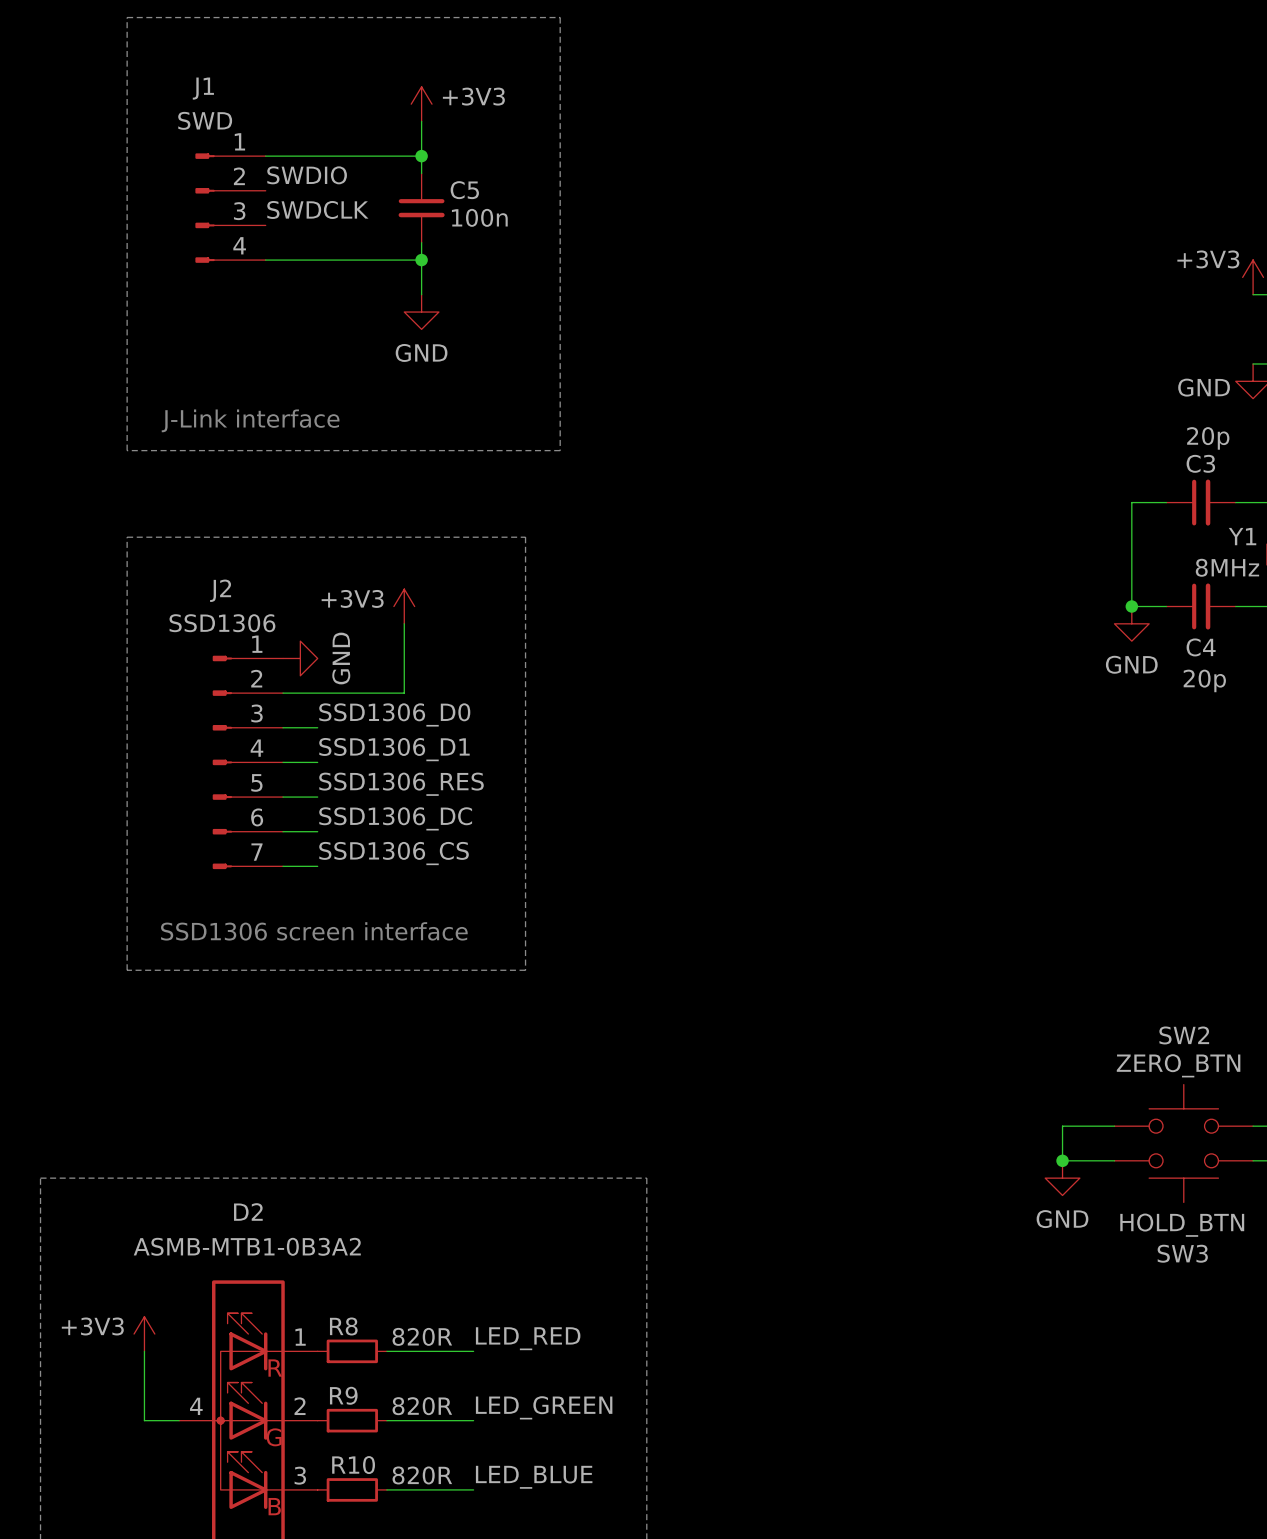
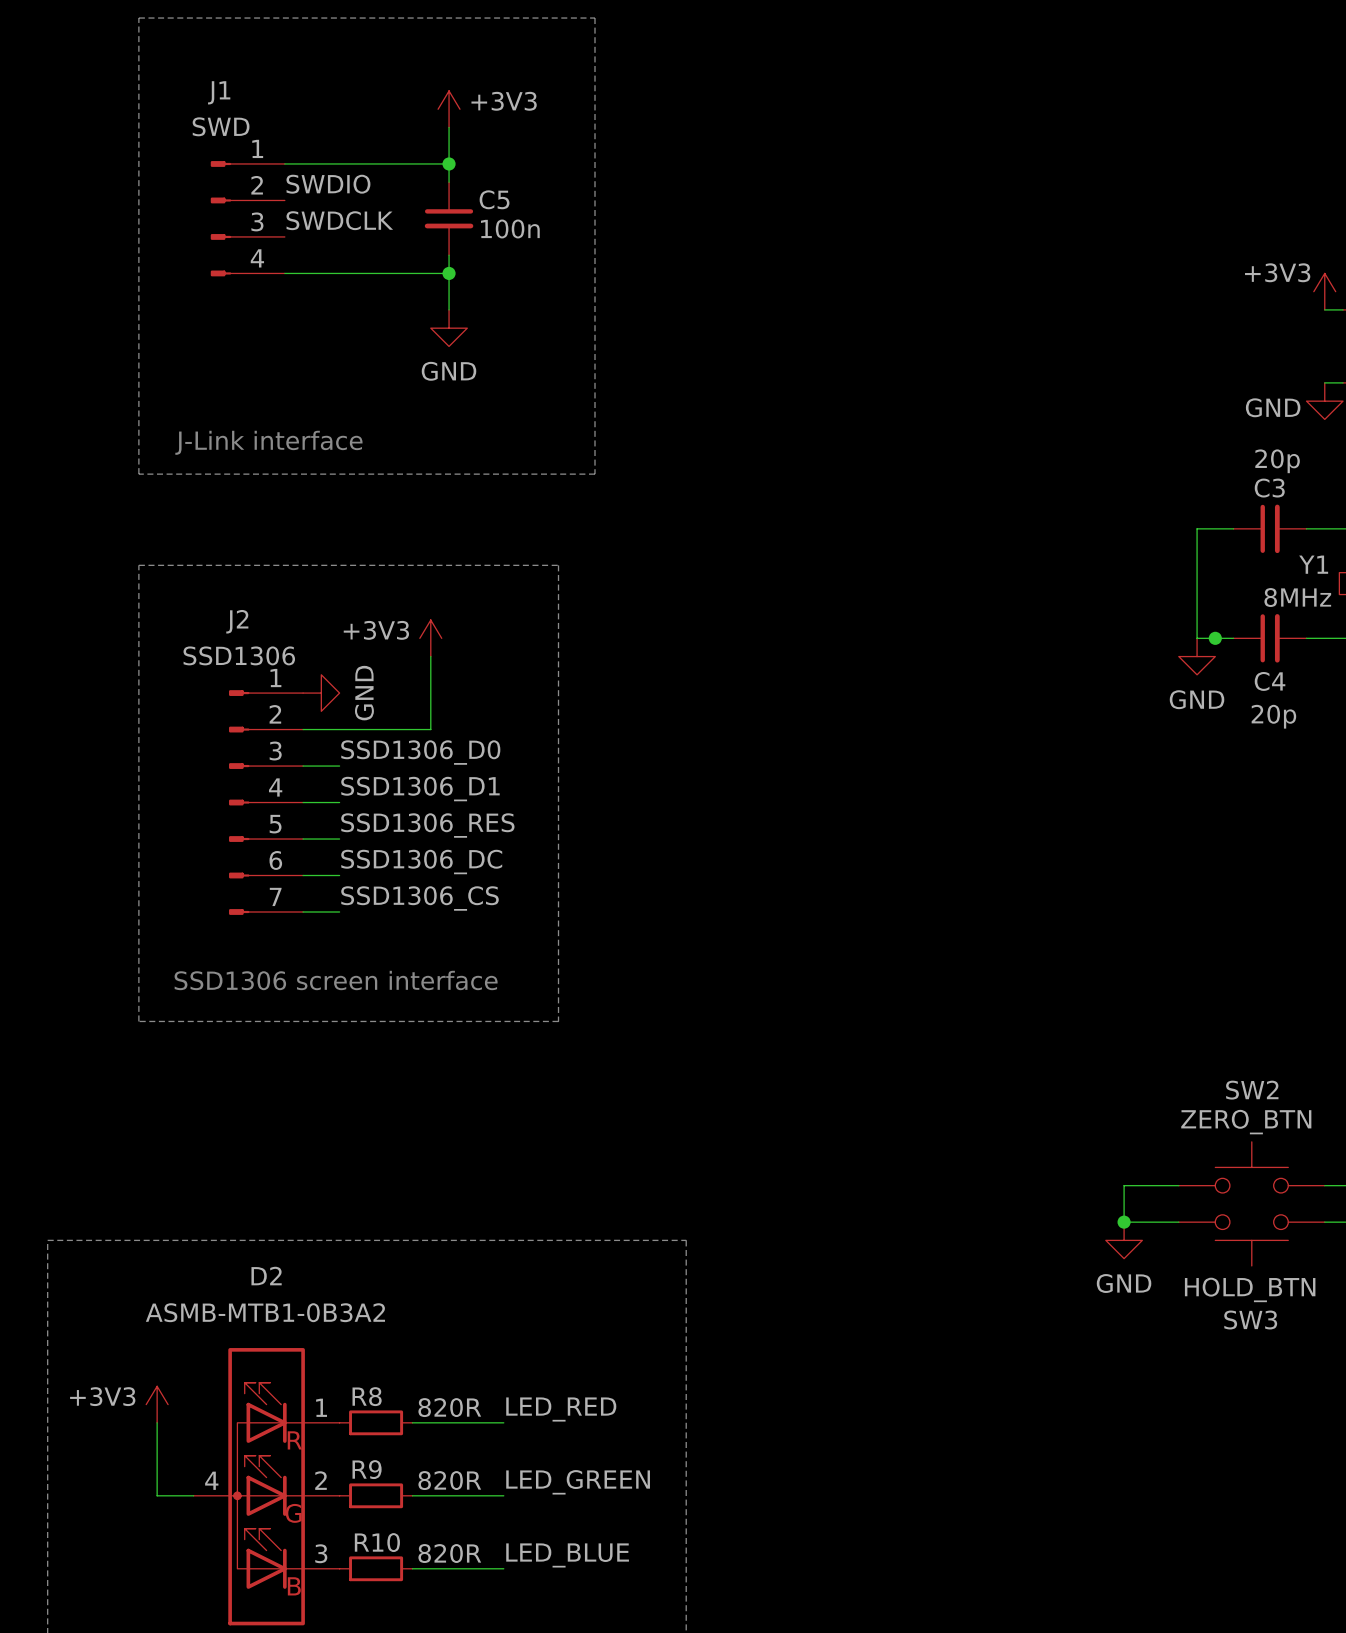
junction position: (1131, 606) -> (1215, 638)

